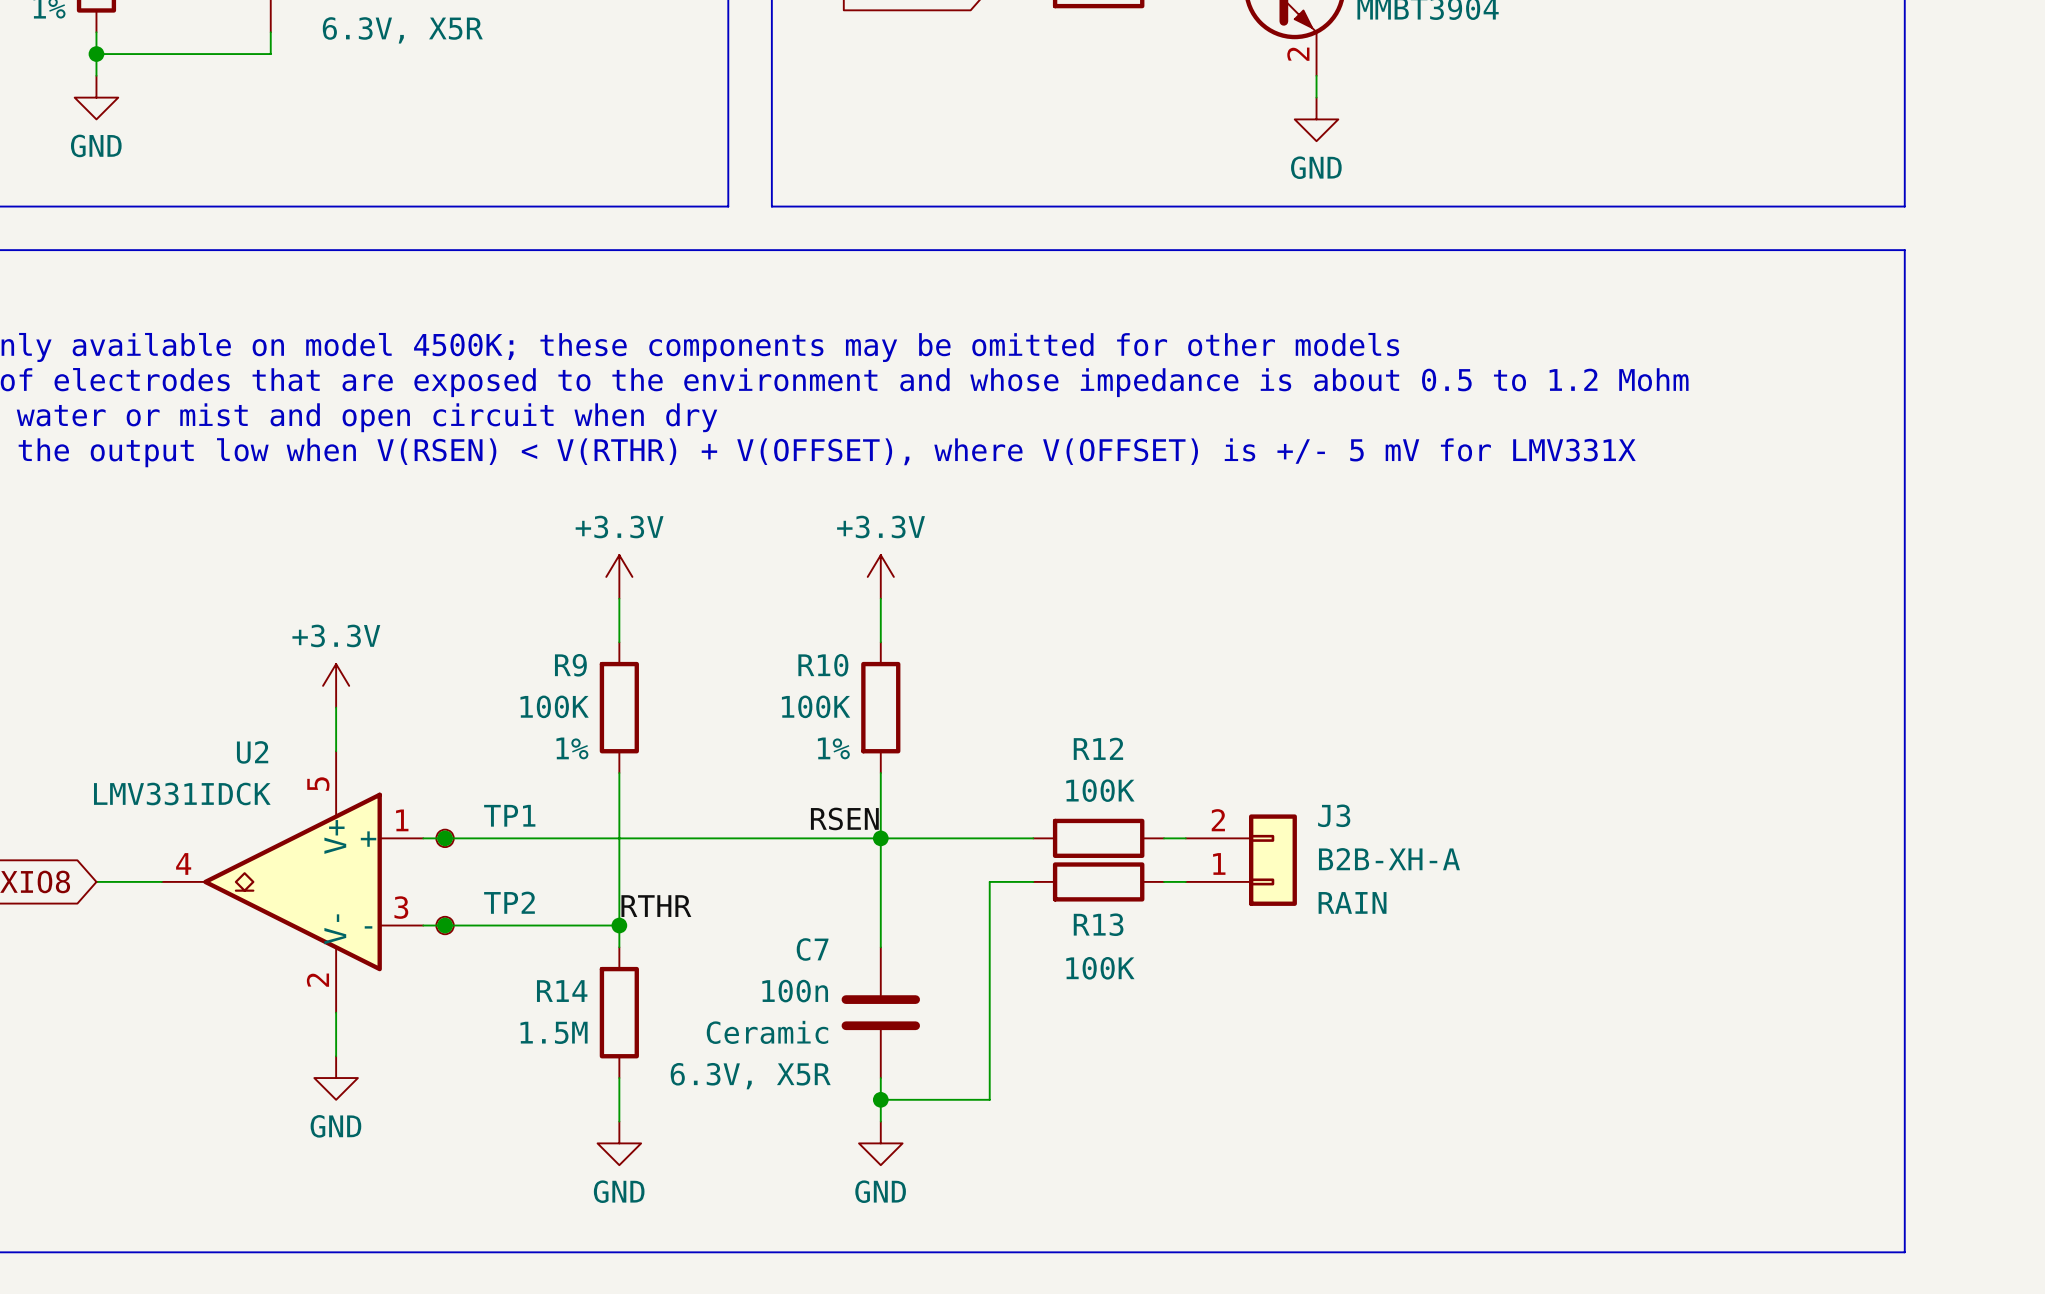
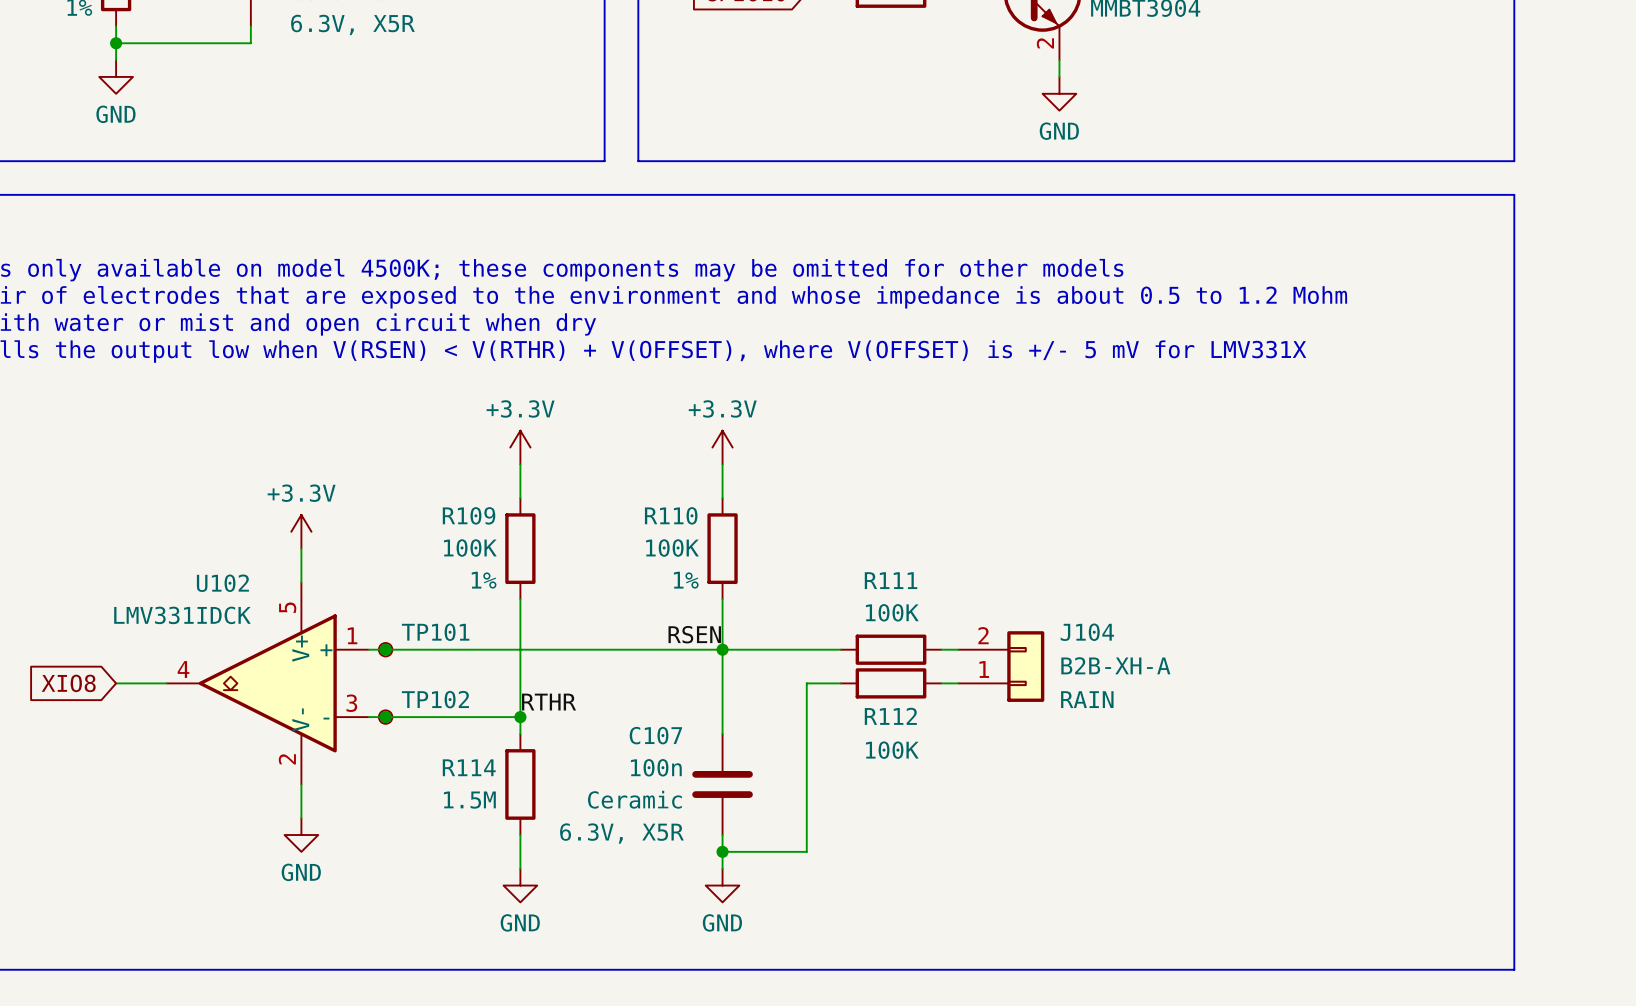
R9 name: R9 (570, 665) -> R109 (469, 515)
R10 name: R10 (823, 665) -> R110 (671, 515)
R12 name: R12 (1098, 748) -> R111 (891, 580)
U2 name: U2 (252, 752) -> U102 (222, 583)
TP1 name: TP1 (509, 815) -> TP101 (435, 632)
J3 name: J3 (1334, 815) -> J104 (1087, 632)
TP2 name: TP2 (509, 902) -> TP102 (435, 699)
R13 name: R13 (1098, 924) -> R112 (890, 716)
C7 name: C7 (812, 949) -> C107 (655, 735)
R14 name: R14 (562, 991) -> R114 (469, 767)

